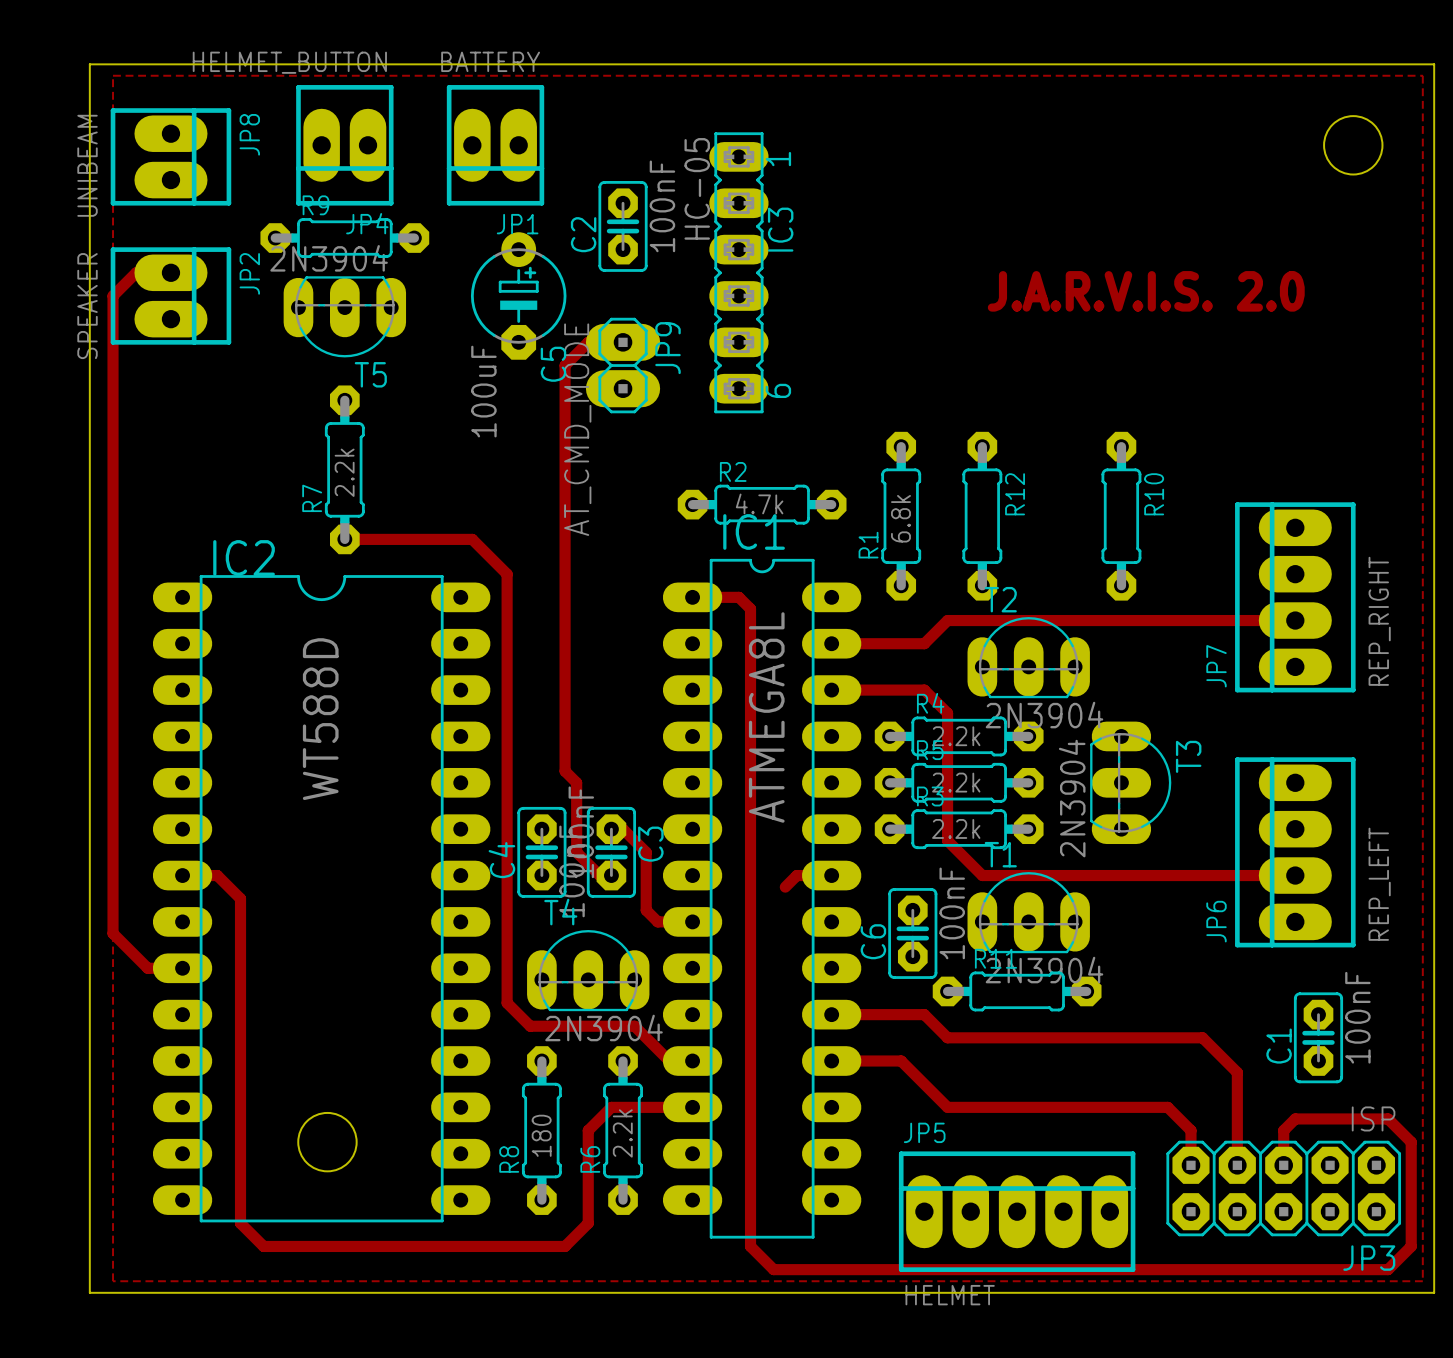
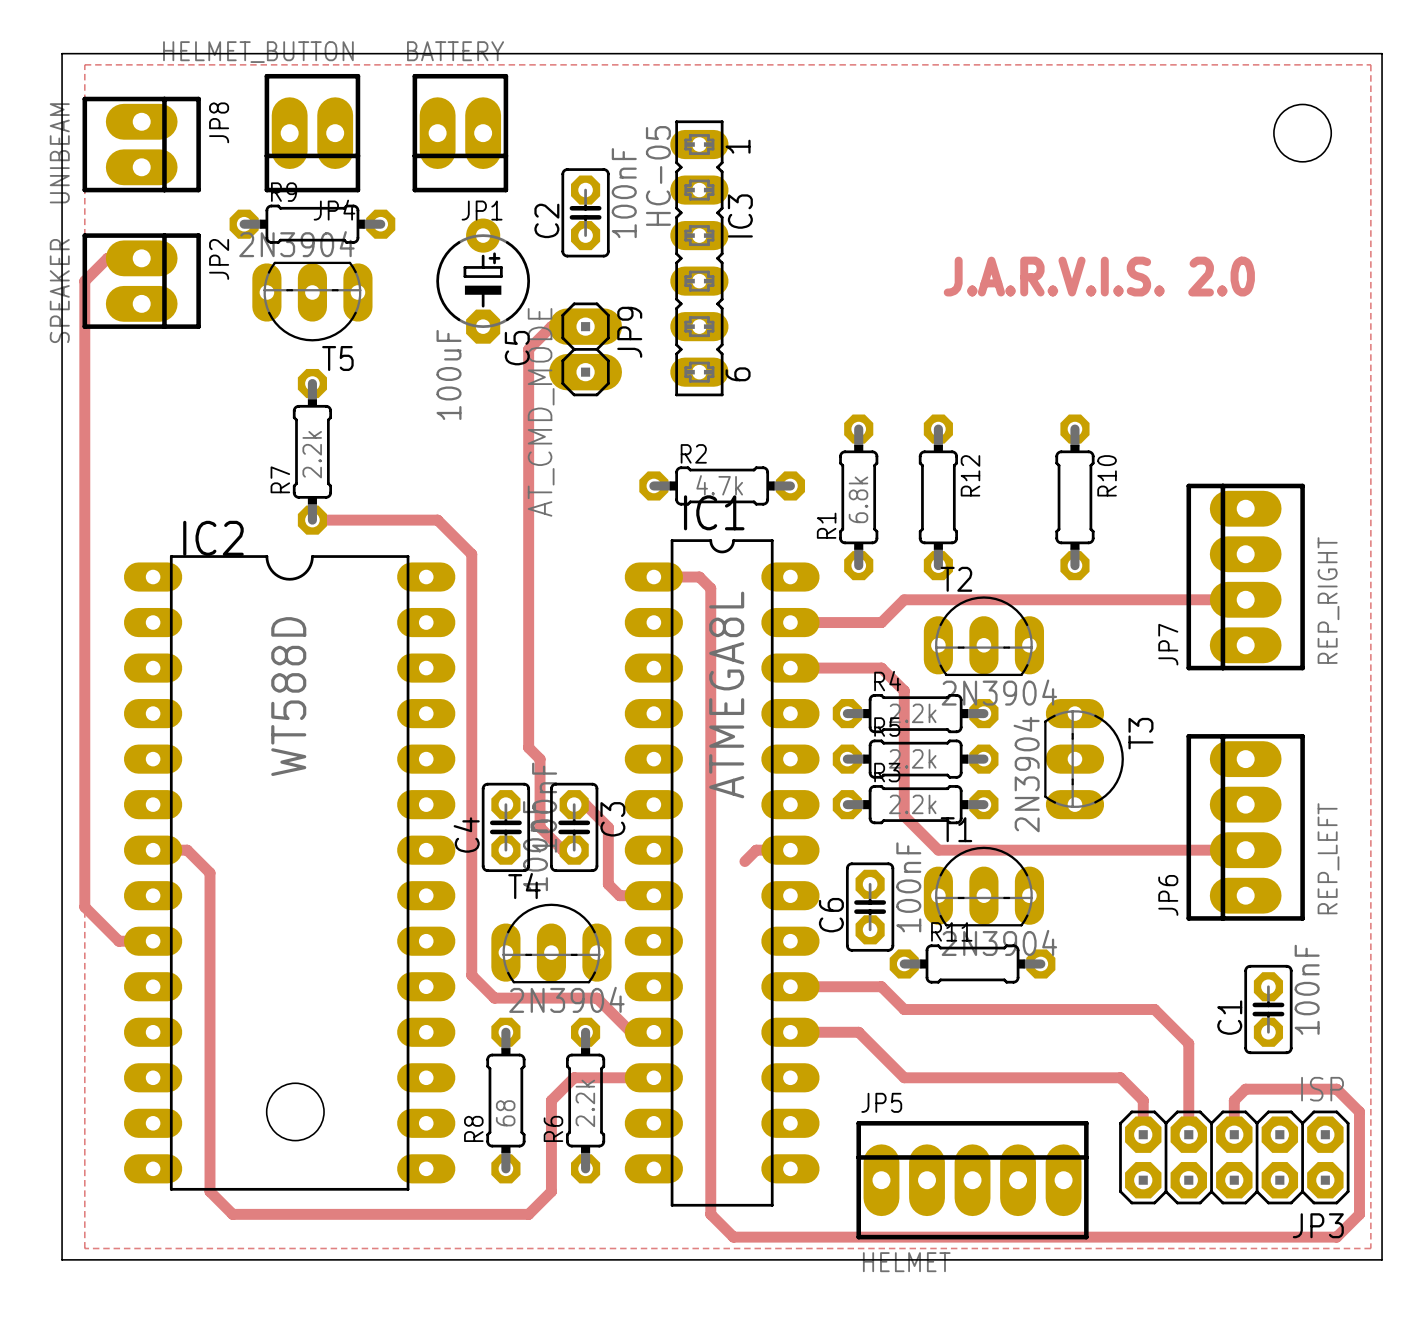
R8 value: 180 (541, 1135) -> 68 (505, 1113)

